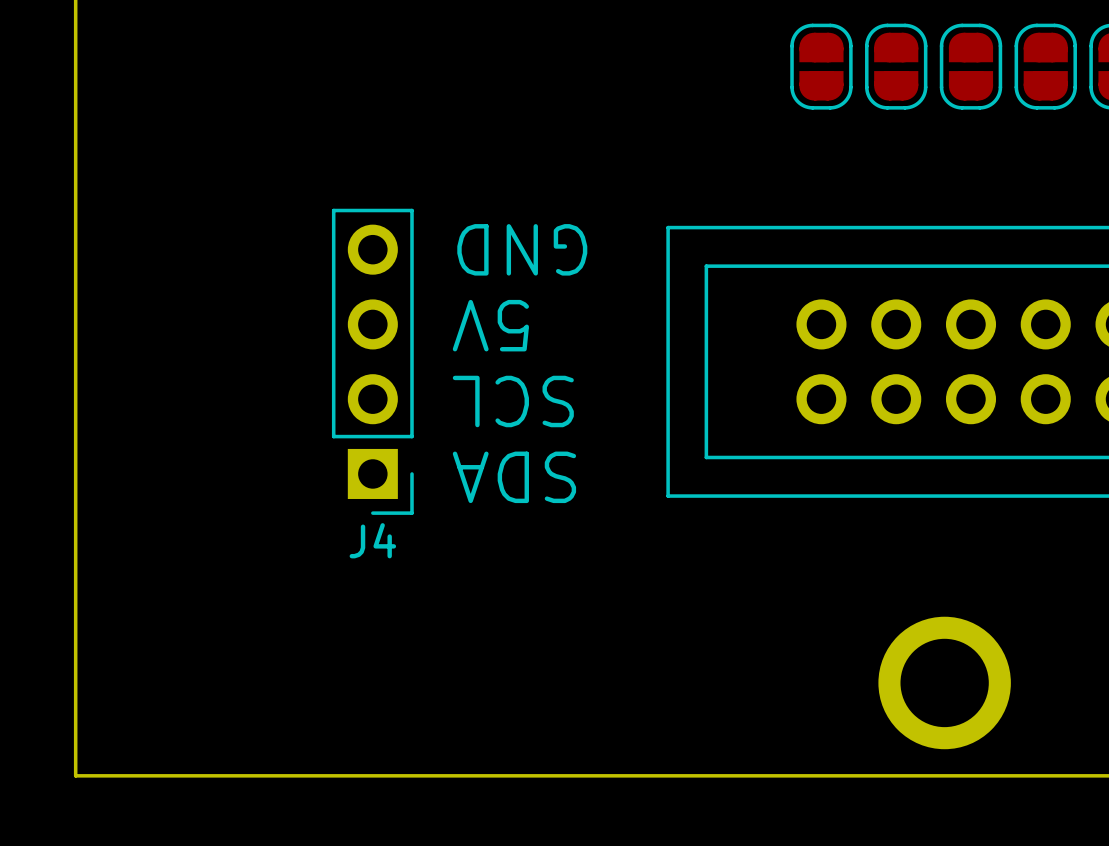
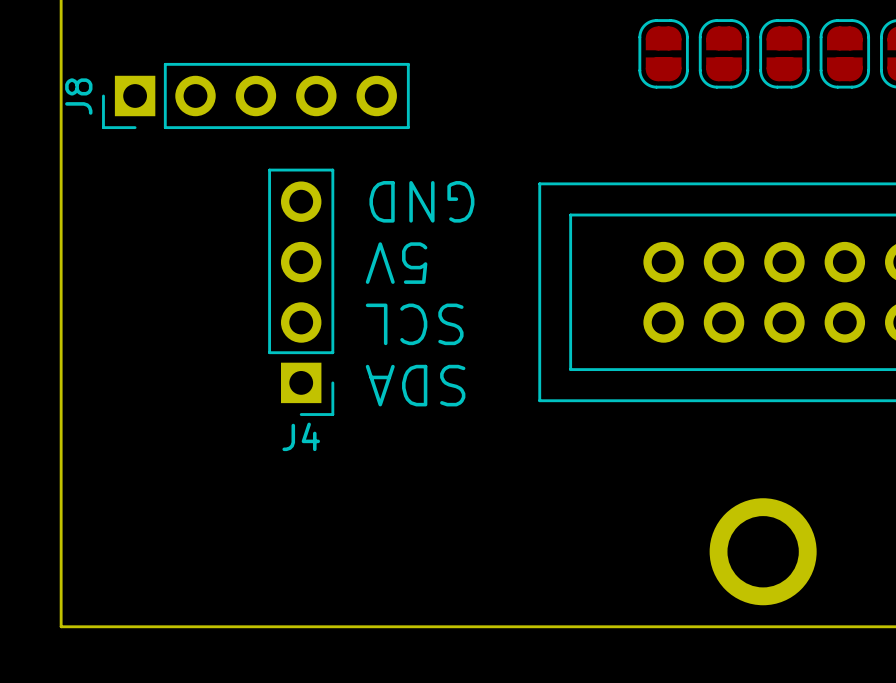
J8: none -> (255, 95)

